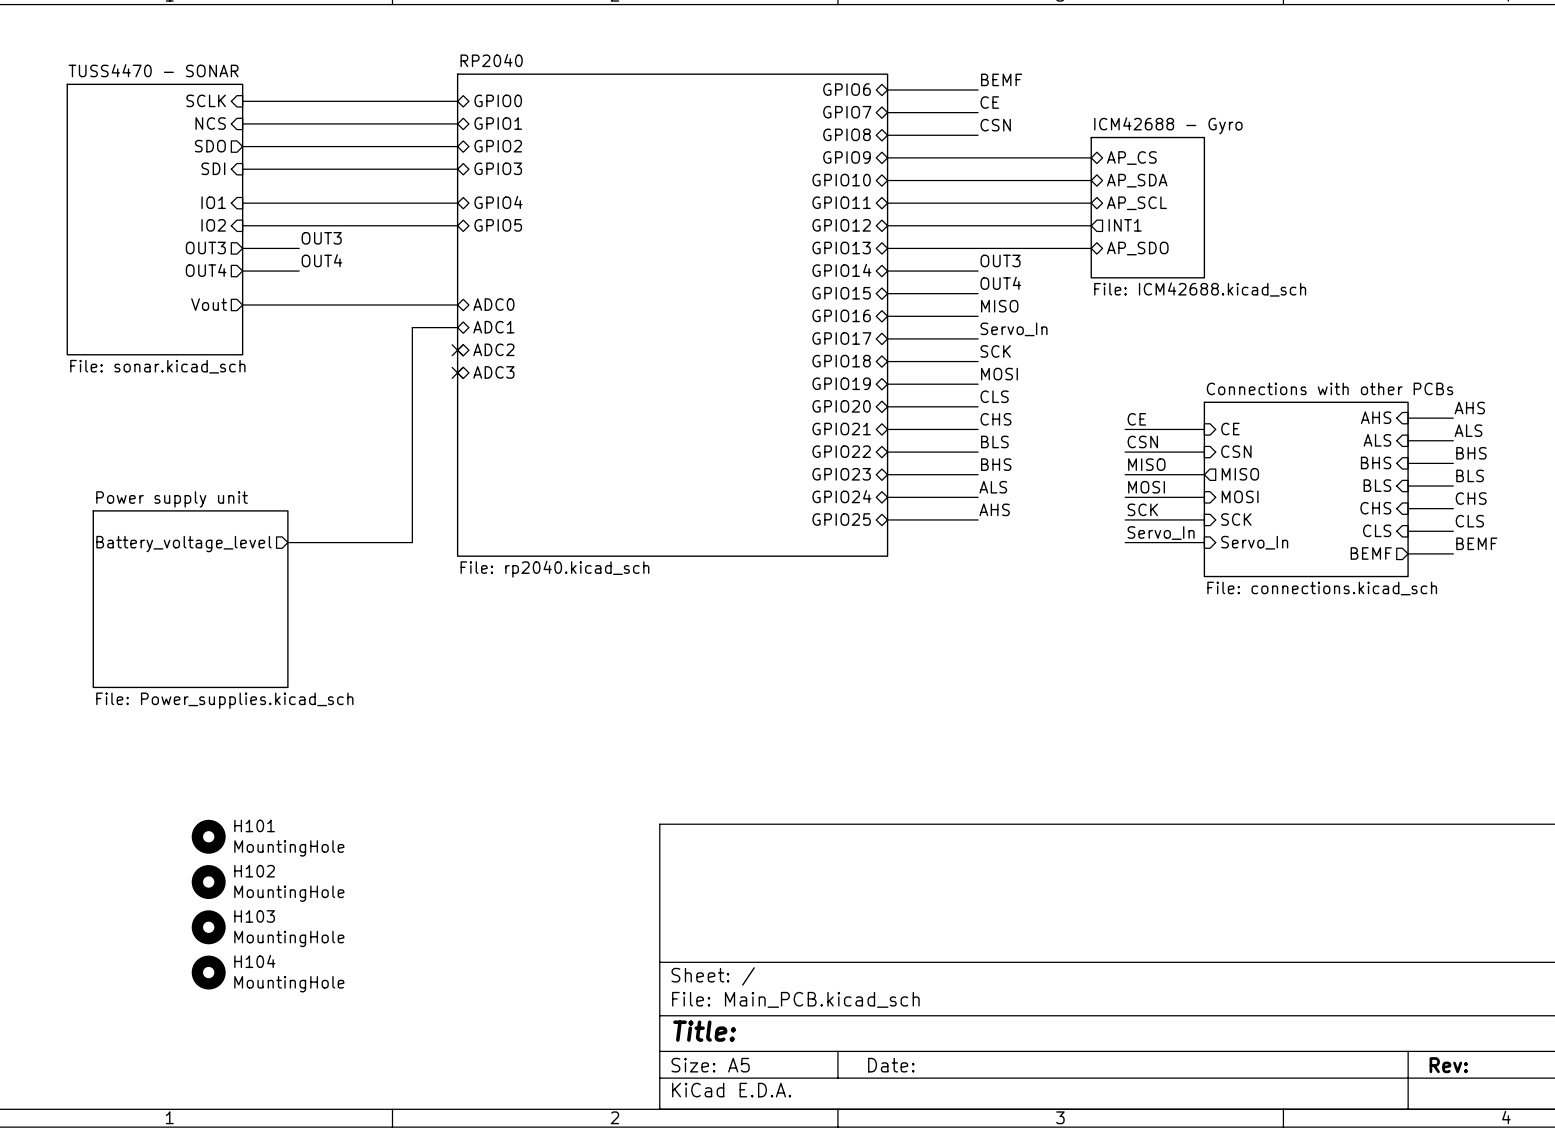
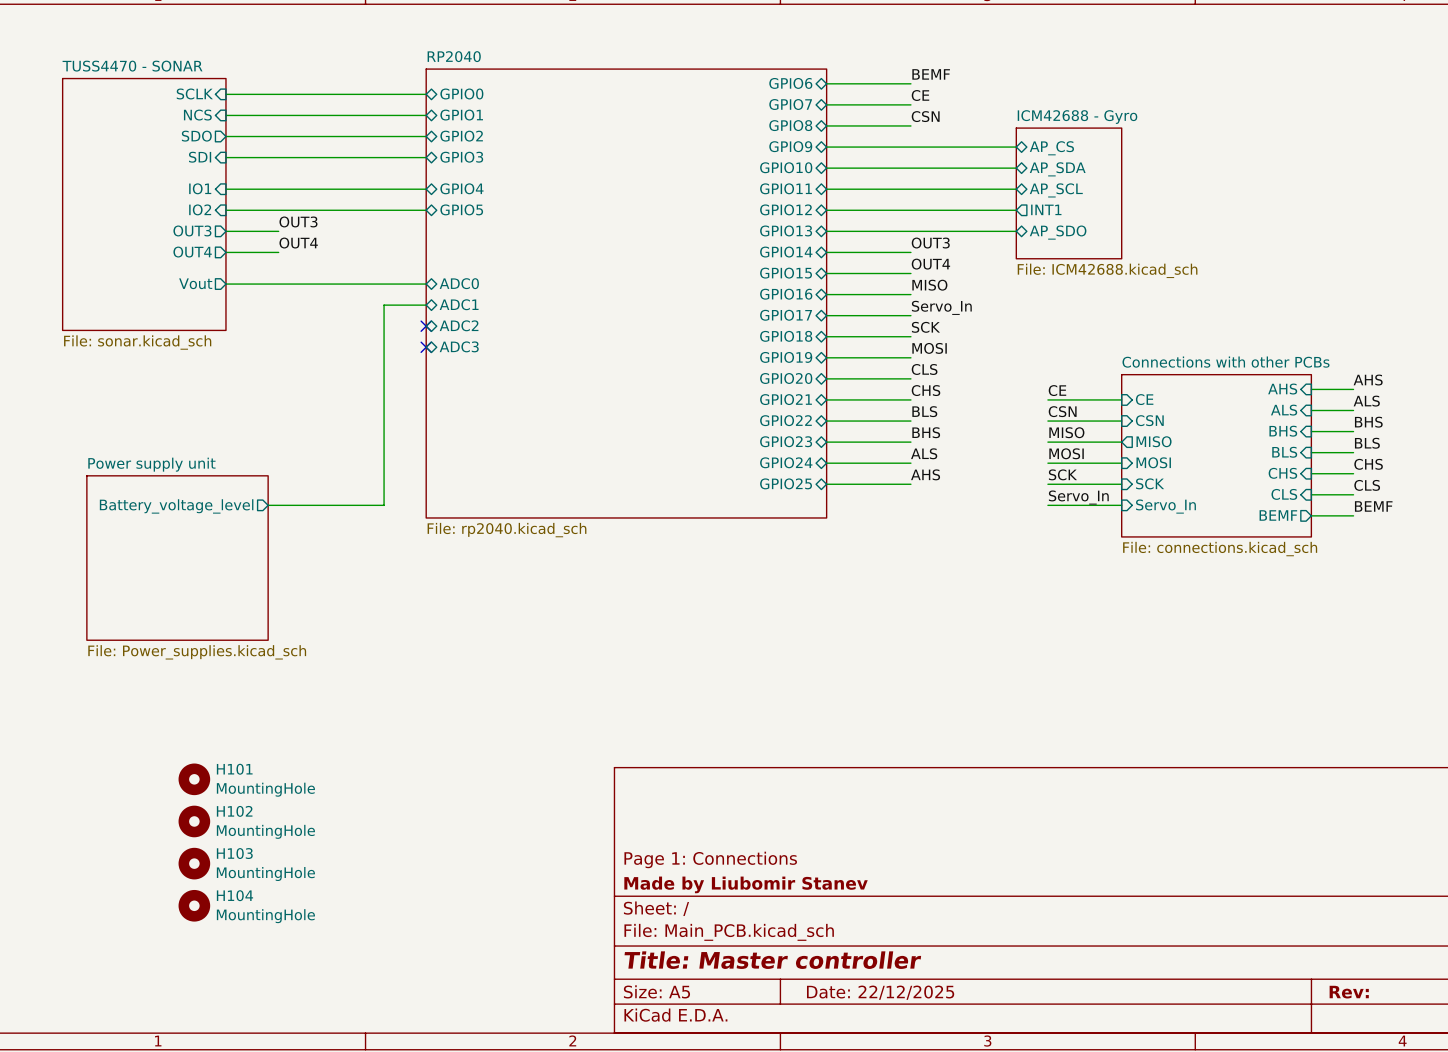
title block: none -> Page 1: Connections (710, 859)
title block: none -> Made by Liubomir Stanev (746, 884)
title block: Title: (704, 1031) -> Title: Master controller (772, 960)
title block: Date: (891, 1065) -> Date: 22/12/2025 (880, 992)

